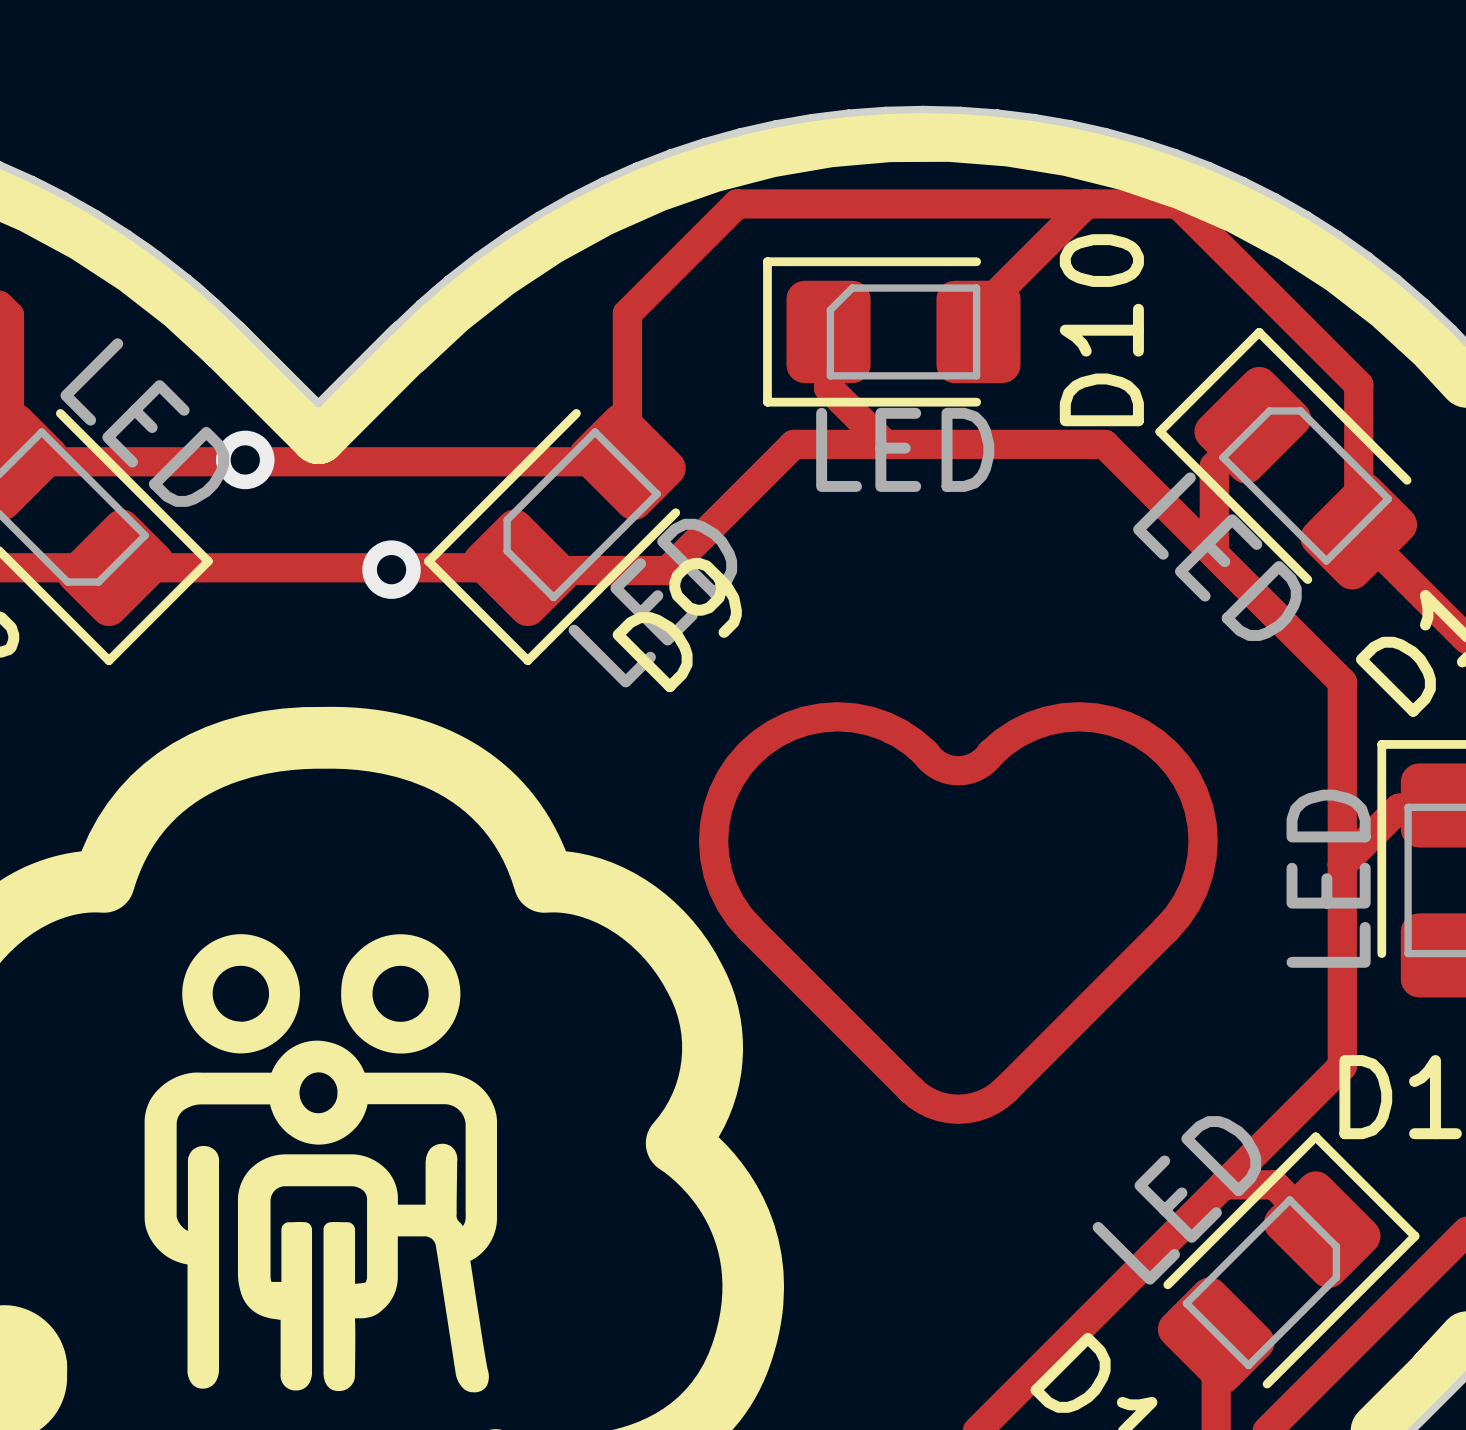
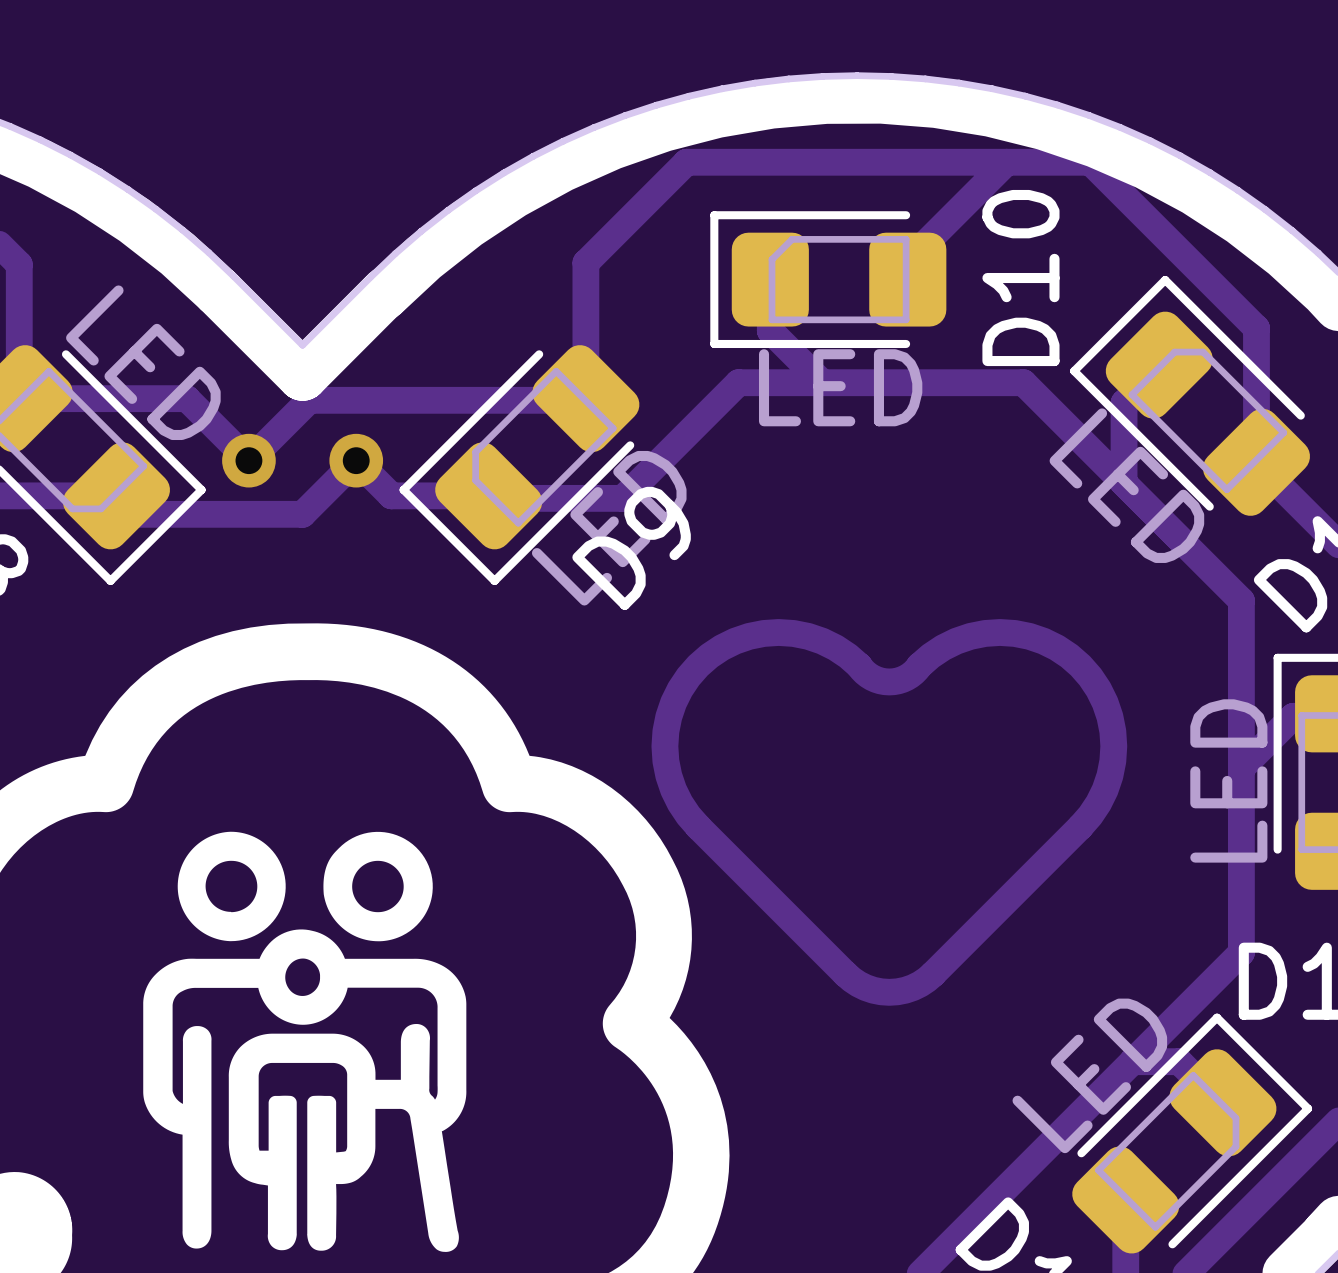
via: (245, 459) -> none
track: (192, 461) (243, 461) (245, 459) (247, 461) (627, 461) -> (186, 398) (248, 460) (309, 400) (585, 400)
via: none -> (248, 460)
track: (152, 567) (389, 567) (391, 569) (393, 567) (415, 567) -> (116, 495) (134, 514) (302, 514) (356, 460) (391, 495)
via position: (391, 569) -> (356, 460)

